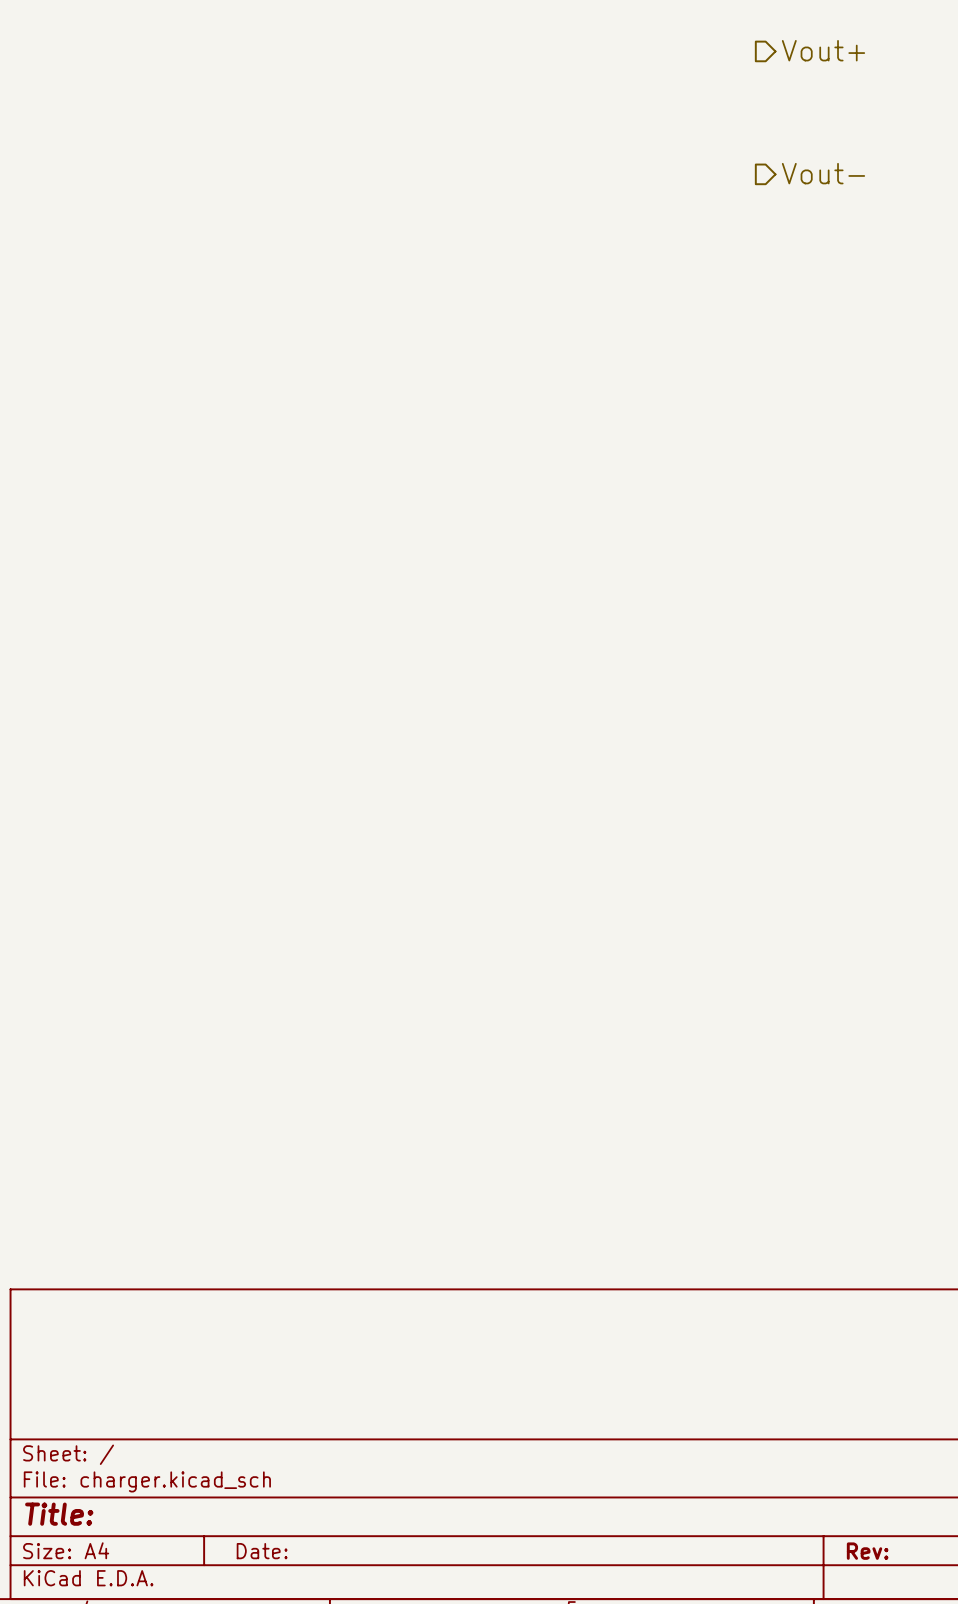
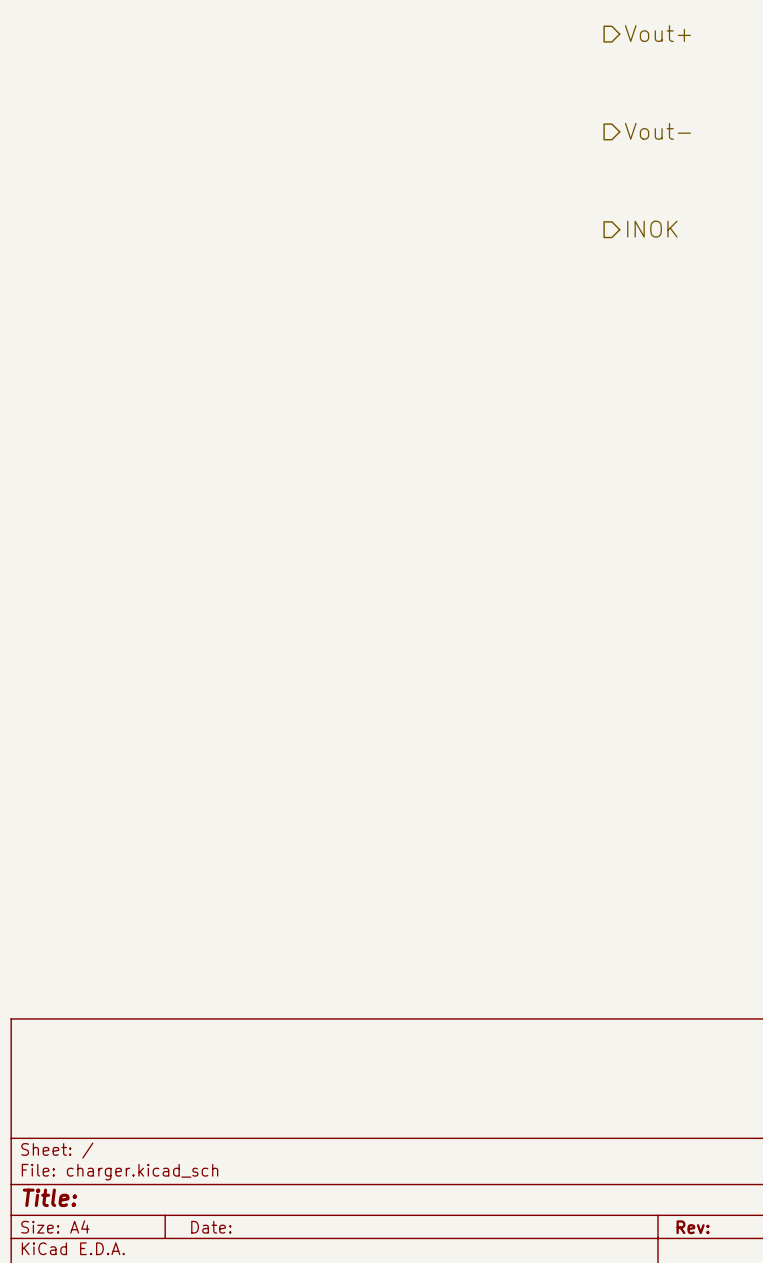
hierarchical label: none -> INOK (652, 229)

